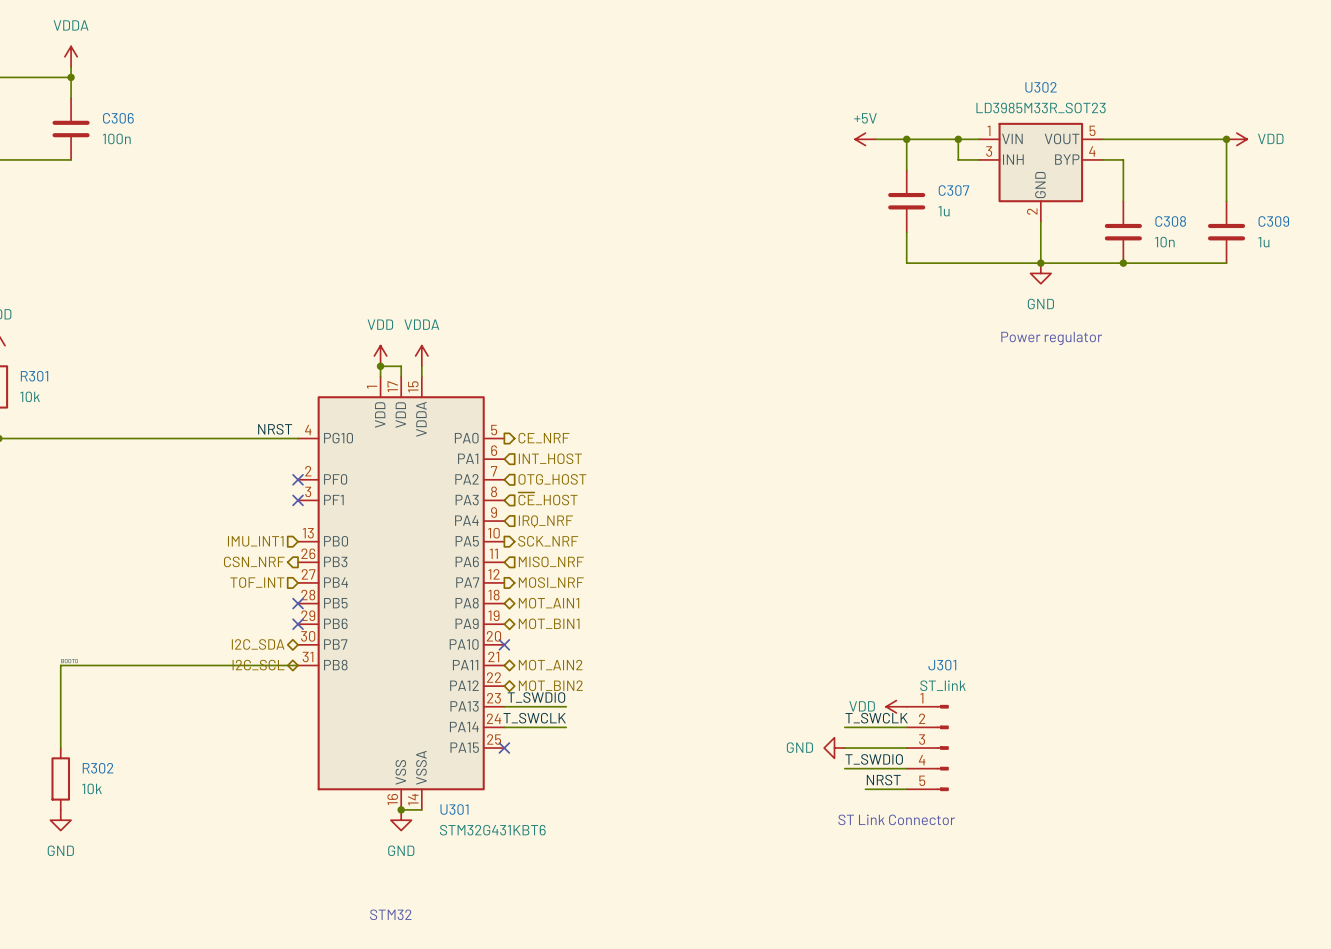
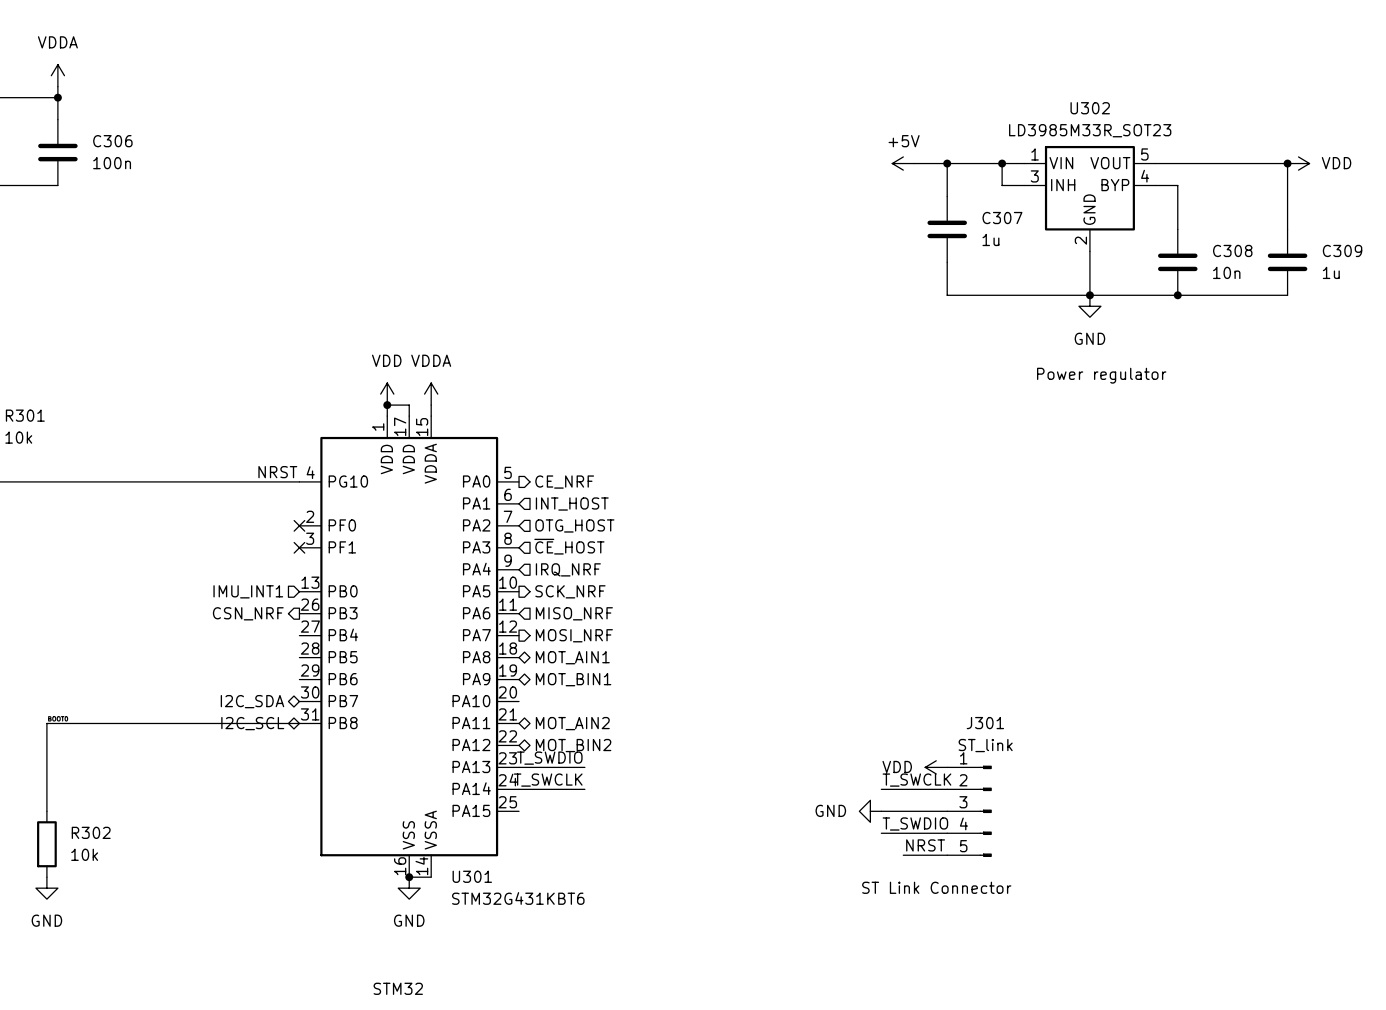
hierarchical label: TOF_INT (257, 582) -> none
no-connect mark: (298, 603) -> none
no-connect mark: (298, 624) -> none
no-connect mark: (504, 644) -> none
no-connect mark: (504, 748) -> none

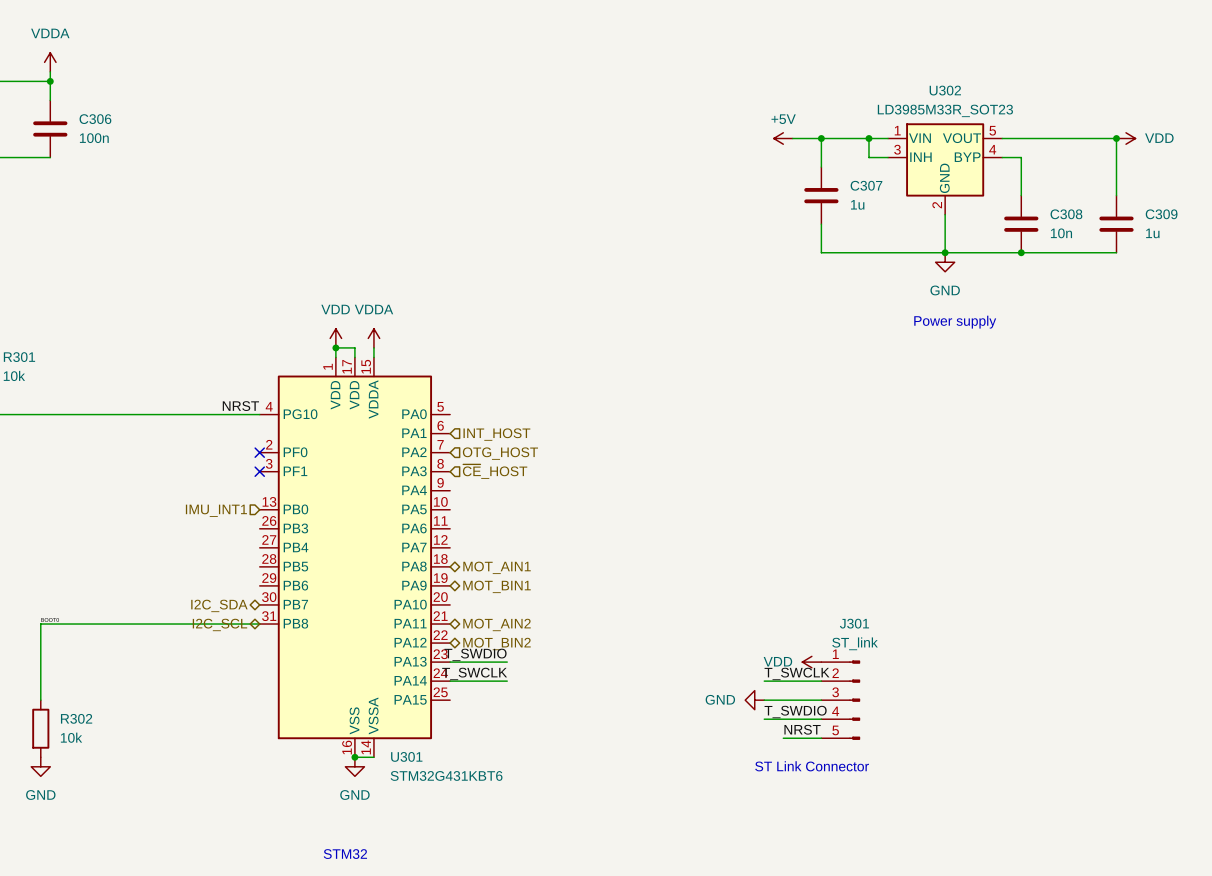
text: Power regulator (1101, 375) -> Power supply (955, 322)
hierarchical label: CE_NRF (564, 482) -> none
hierarchical label: IRQ_NRF (568, 569) -> none
hierarchical label: SCK_NRF (570, 591) -> none
hierarchical label: CSN_NRF (248, 613) -> none
hierarchical label: MISO_NRF (574, 613) -> none
hierarchical label: MOSI_NRF (574, 635) -> none

